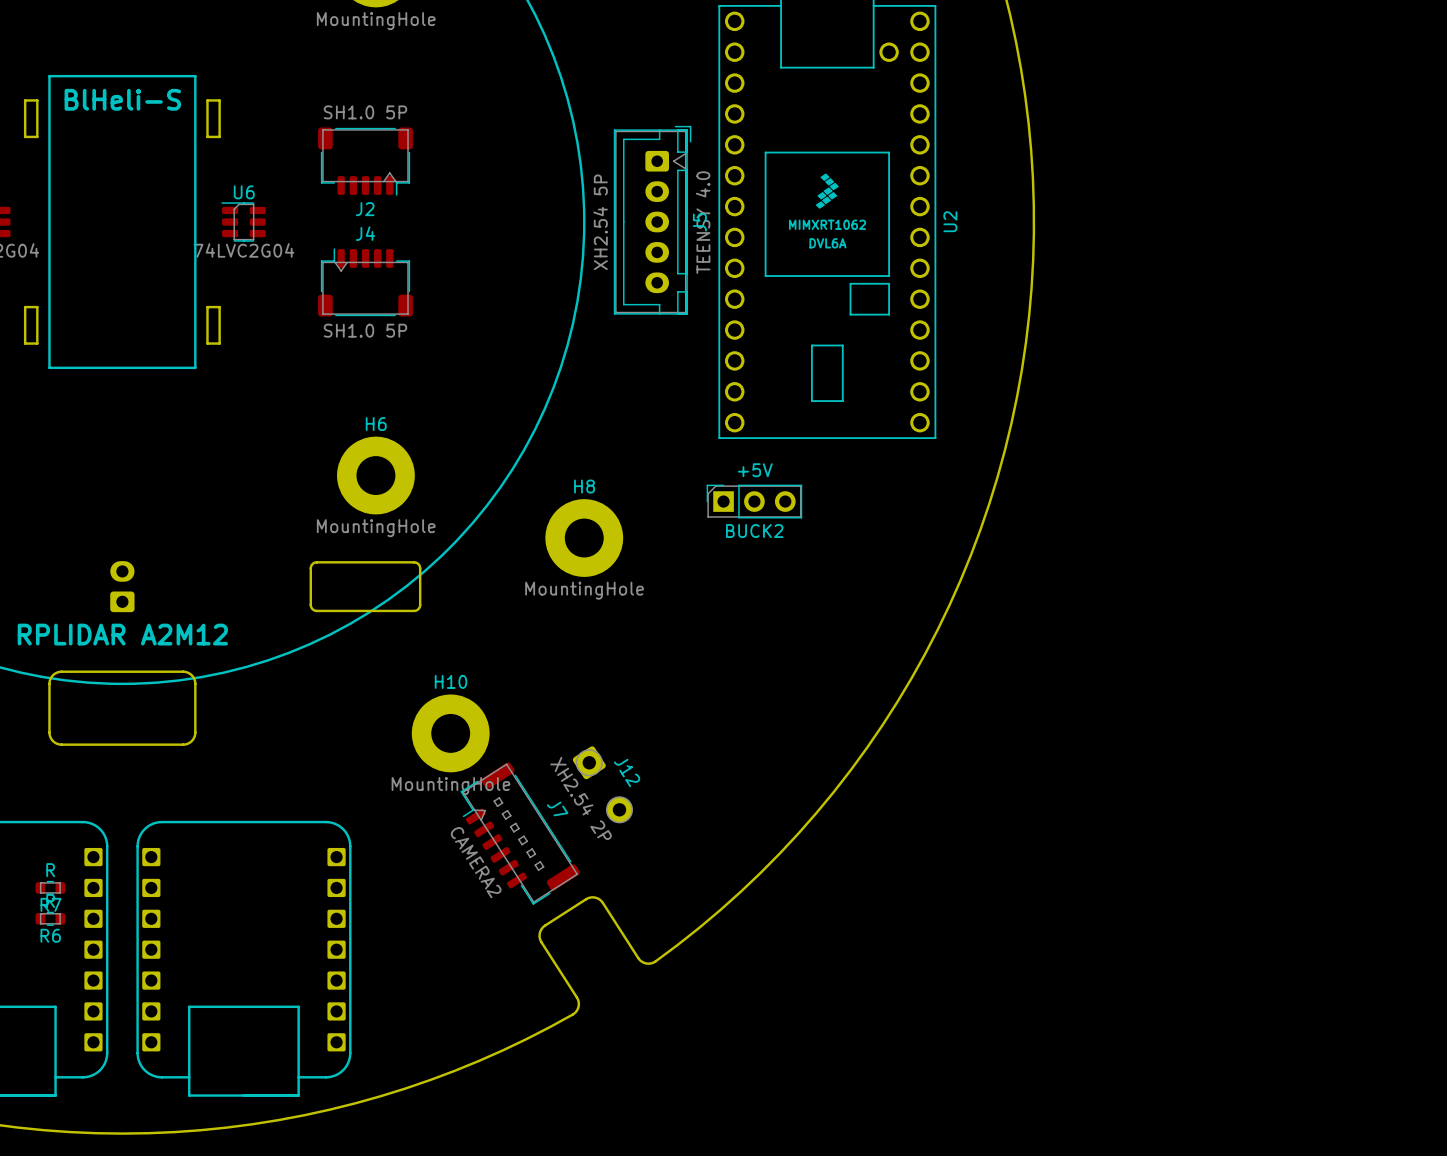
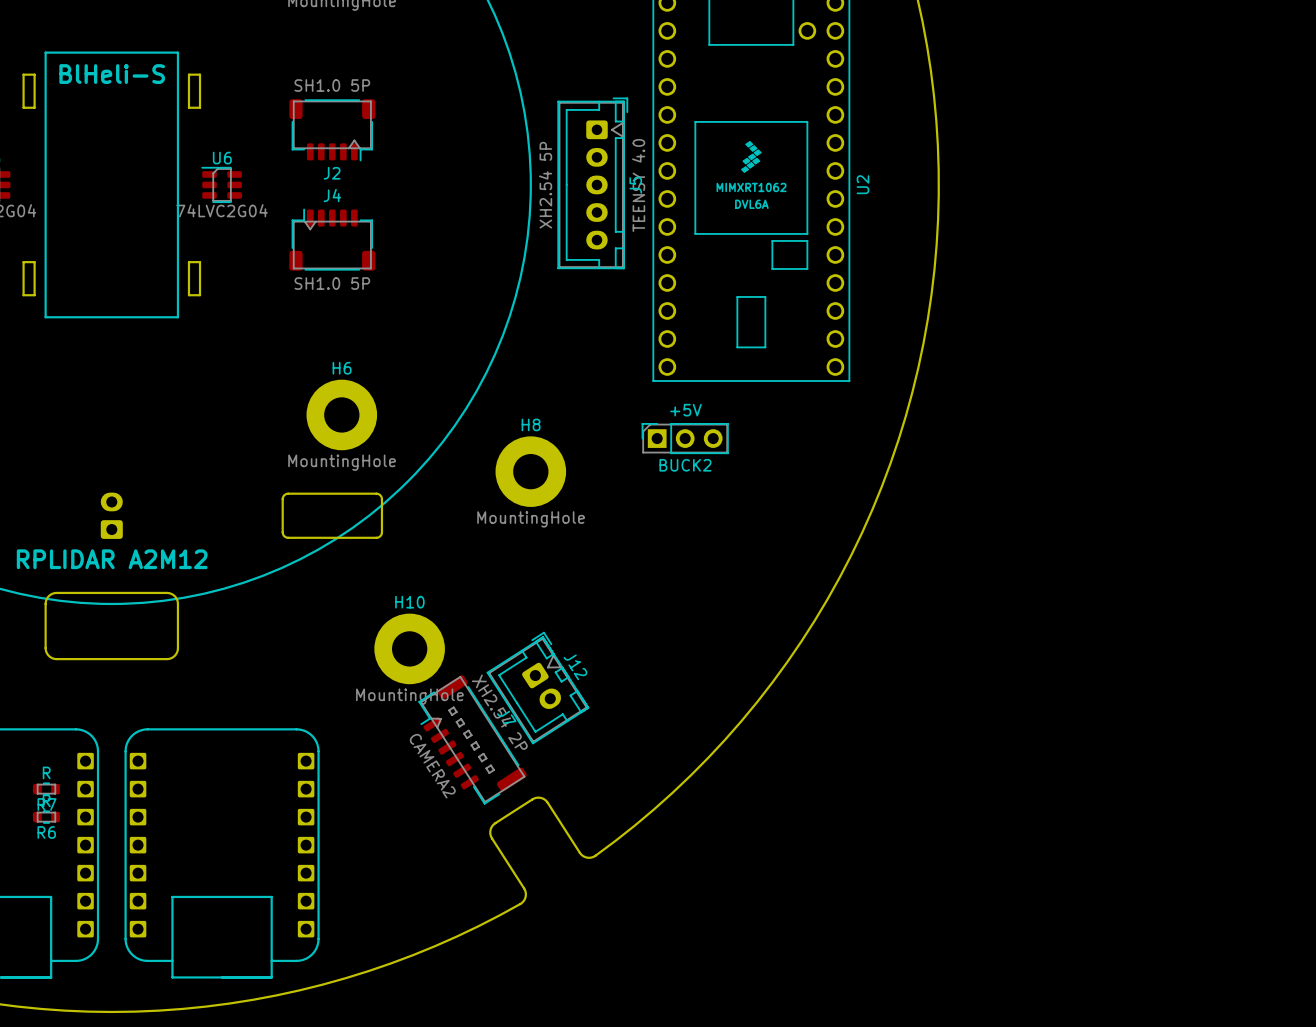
J12 footprint: [572, 746, 633, 824] -> [486, 632, 590, 745]

